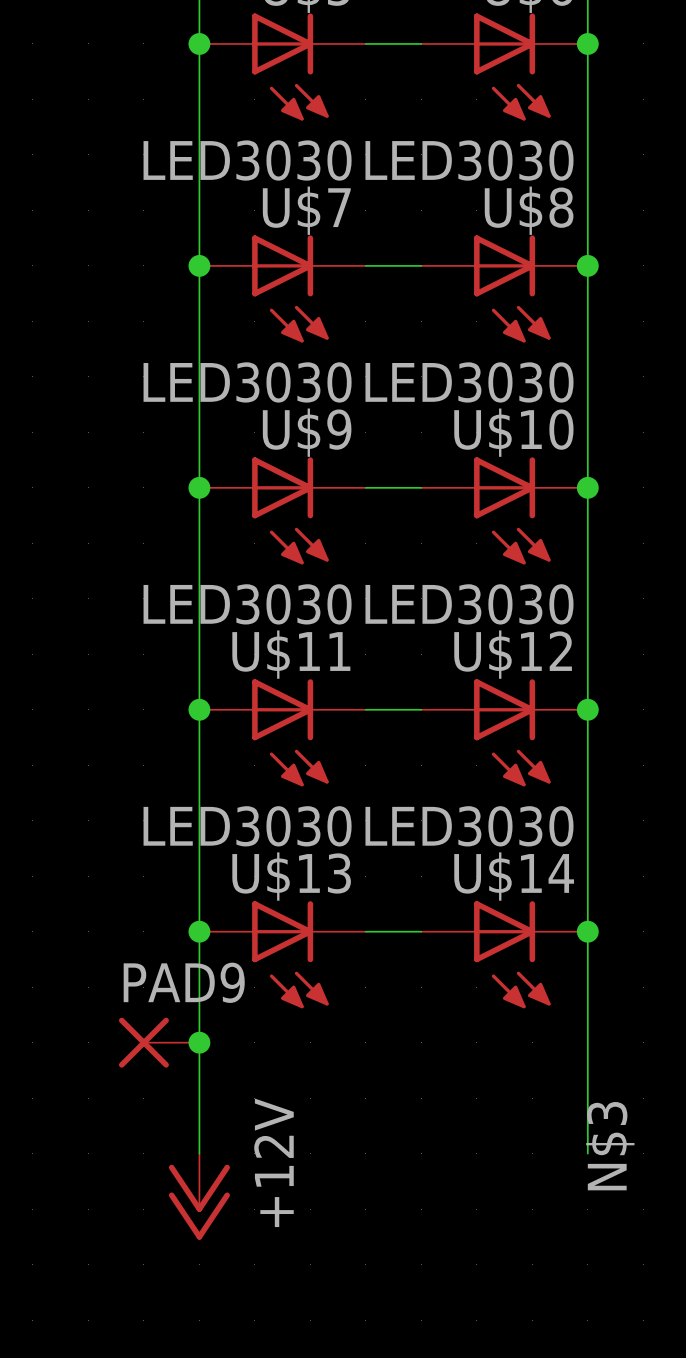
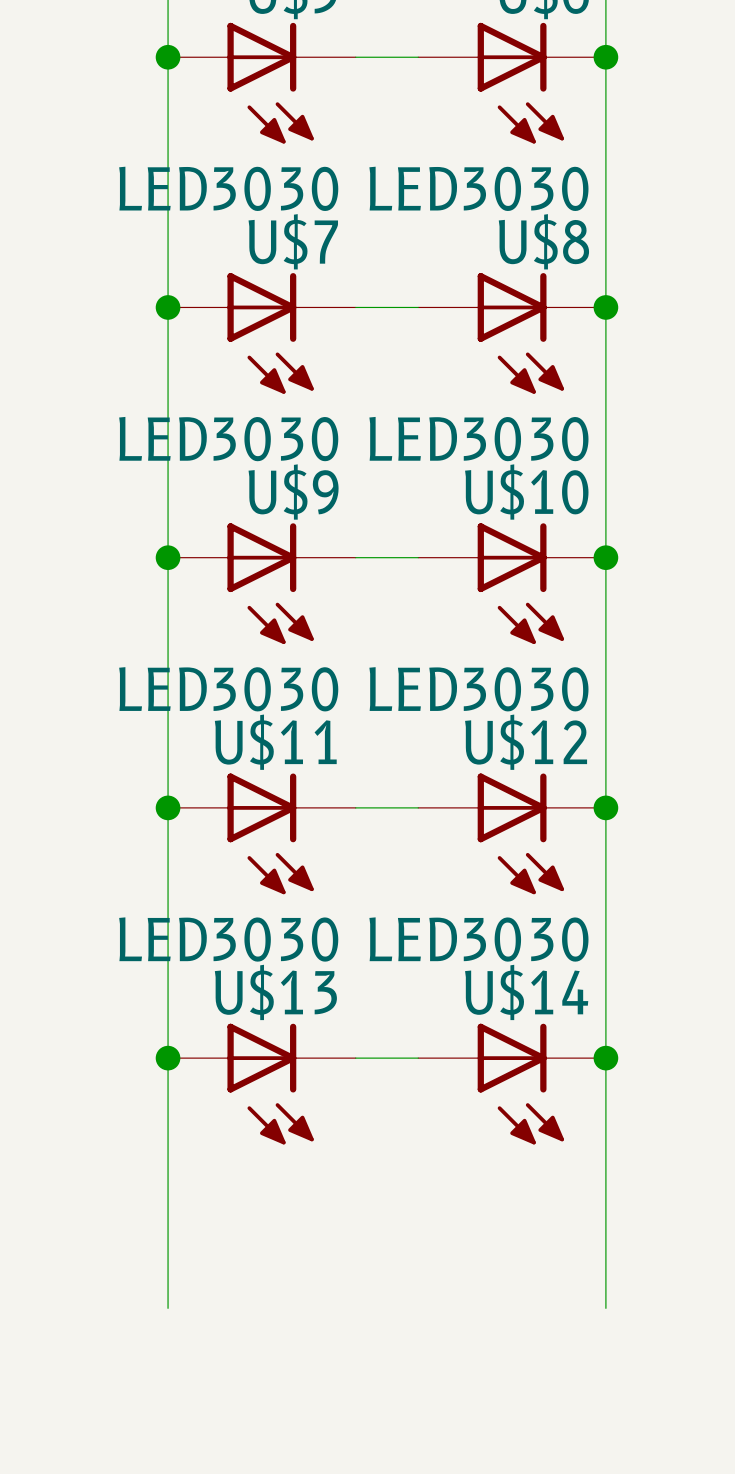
PAD9: (159, 1042) -> none
junction: (199, 1042) -> none
label: N$3 (610, 1146) -> none
power symbol: +12V (199, 1196) -> none

